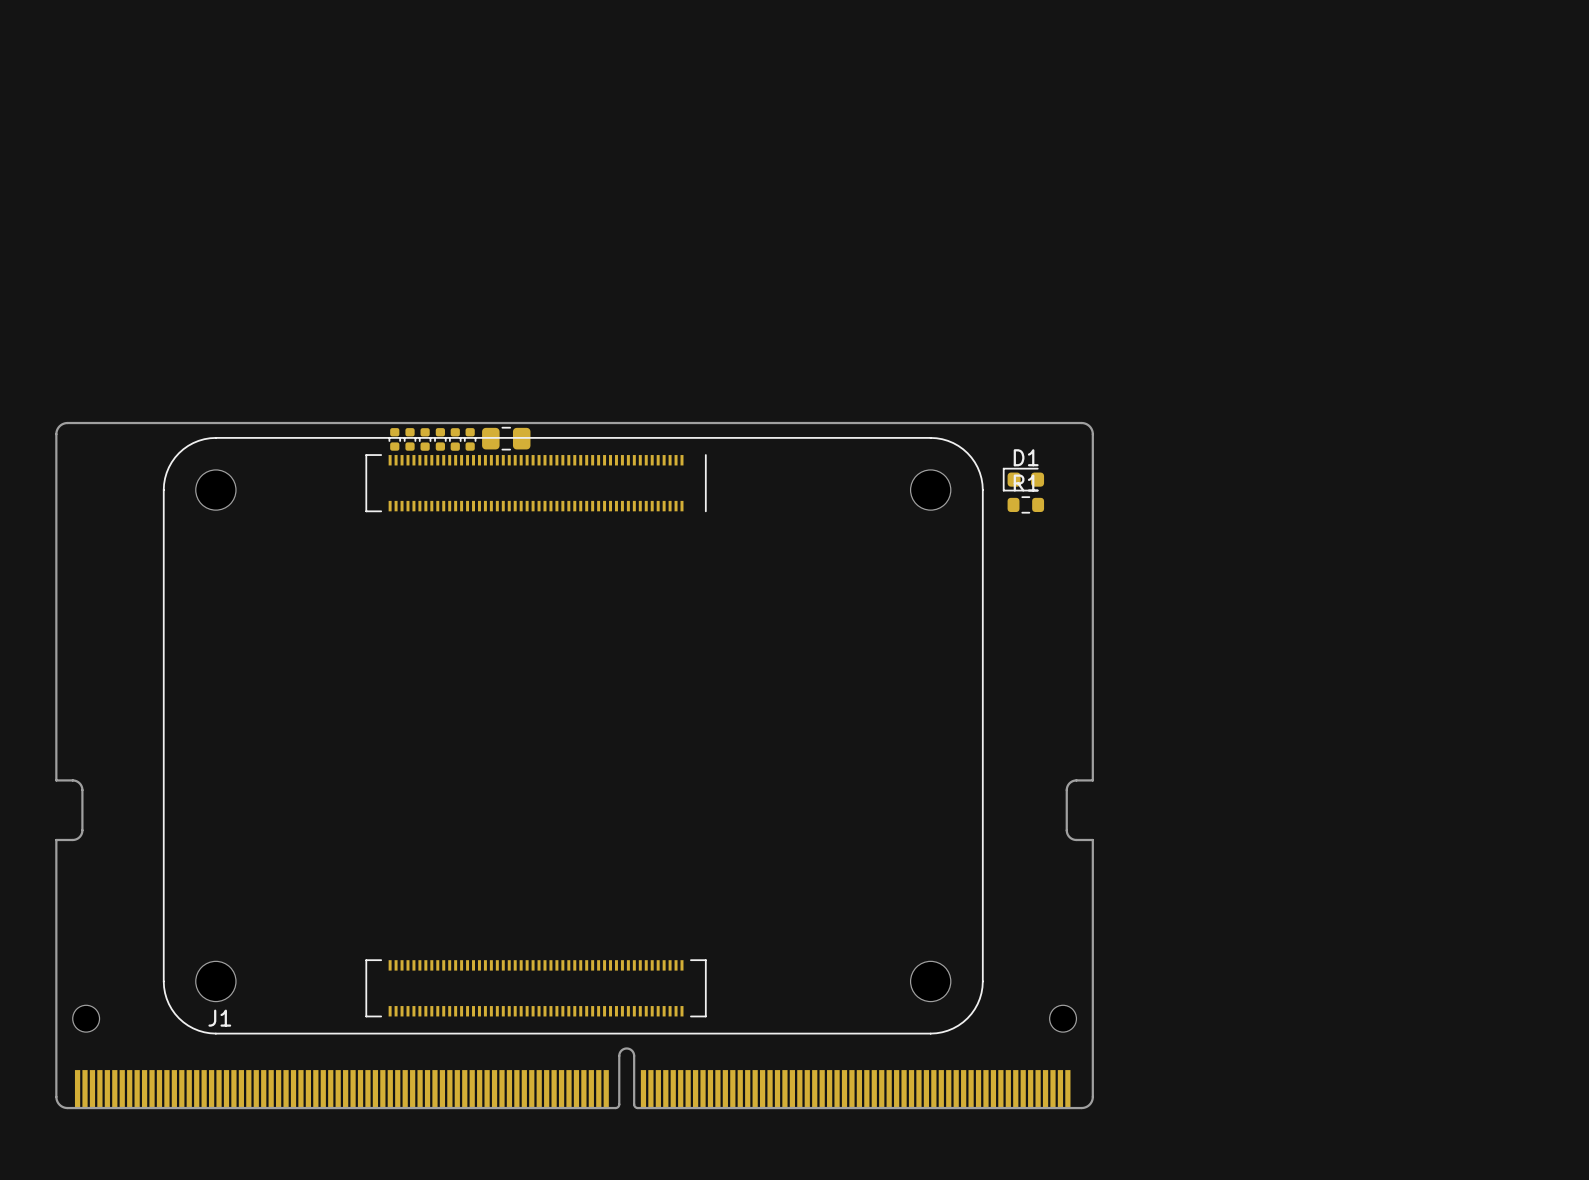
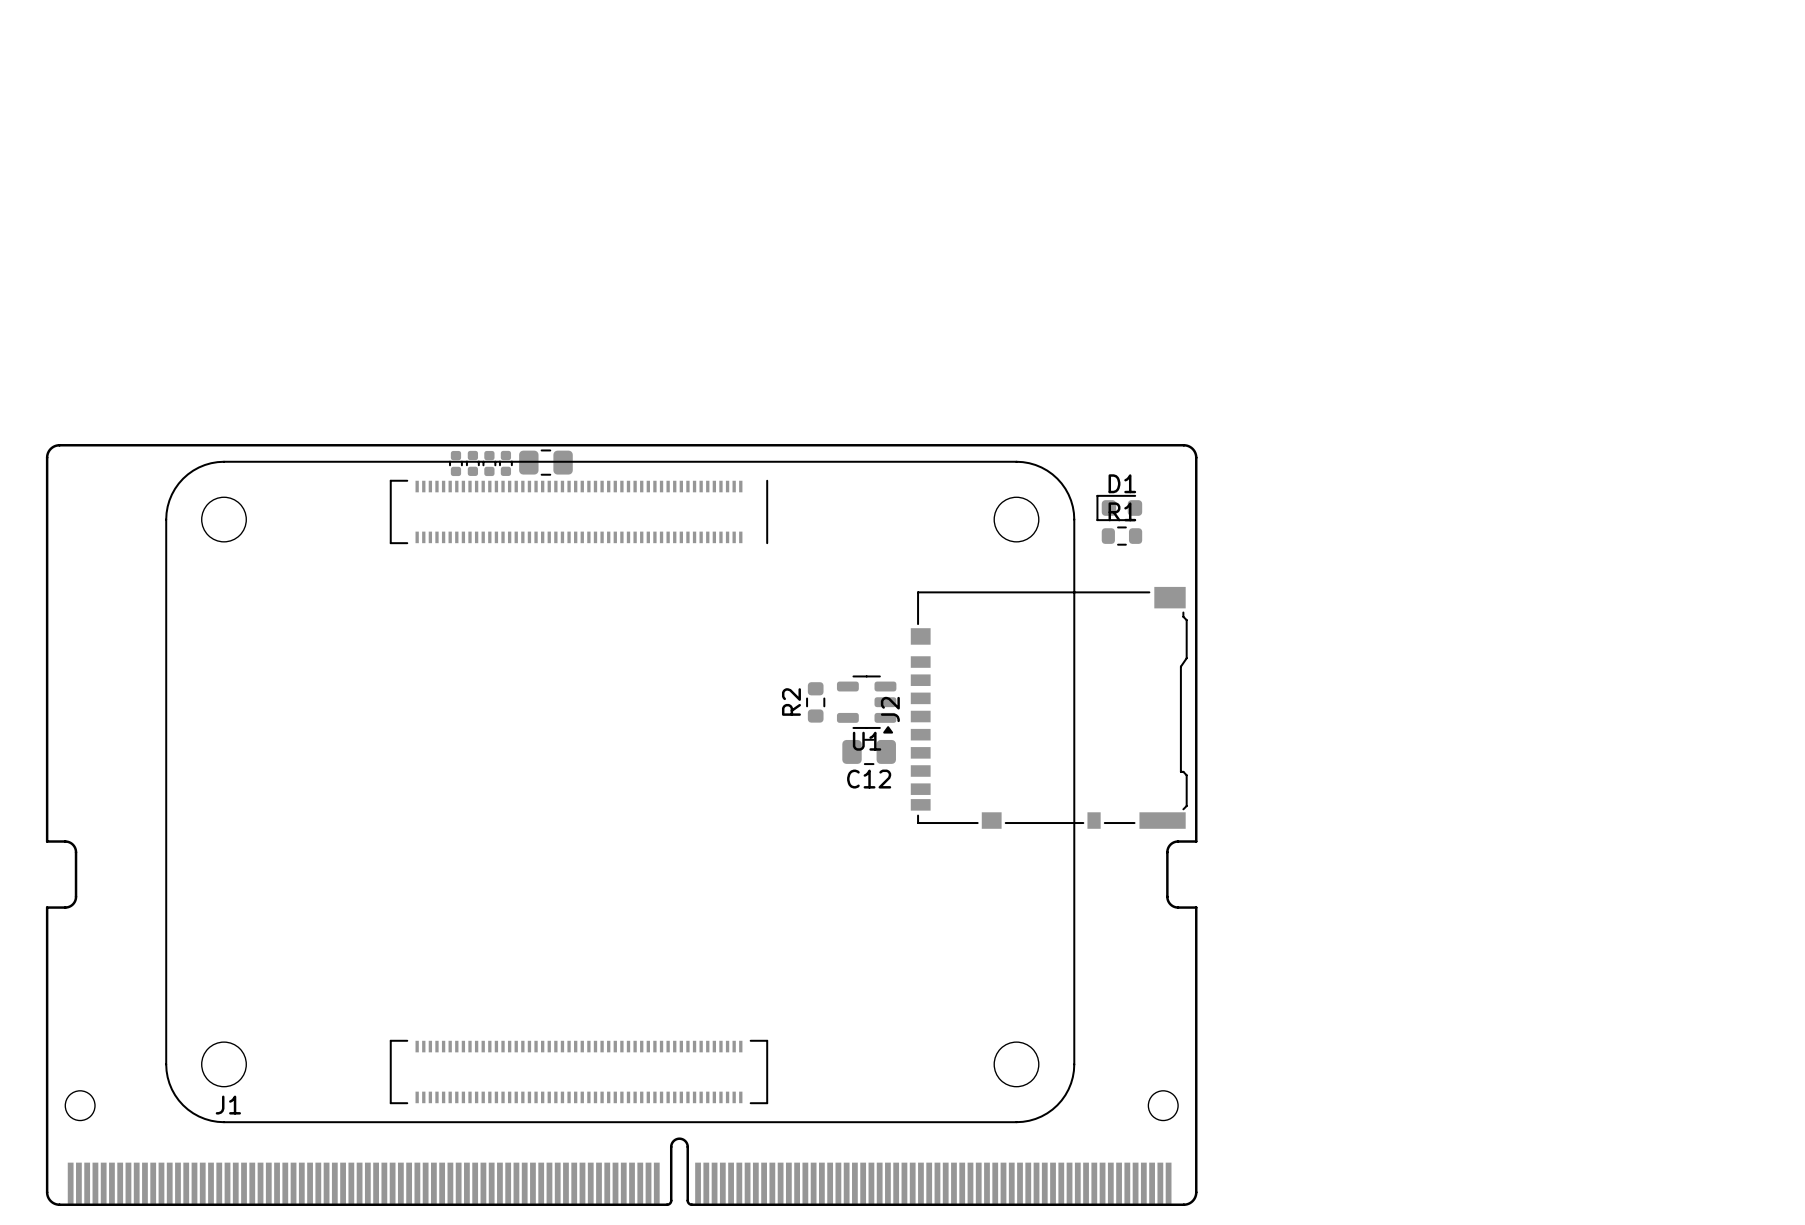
part: (394, 439) -> none
part: (410, 439) -> none
R2: none -> (815, 702)
U1: none -> (866, 704)
J2: none -> (1049, 707)
C12: none -> (869, 751)

